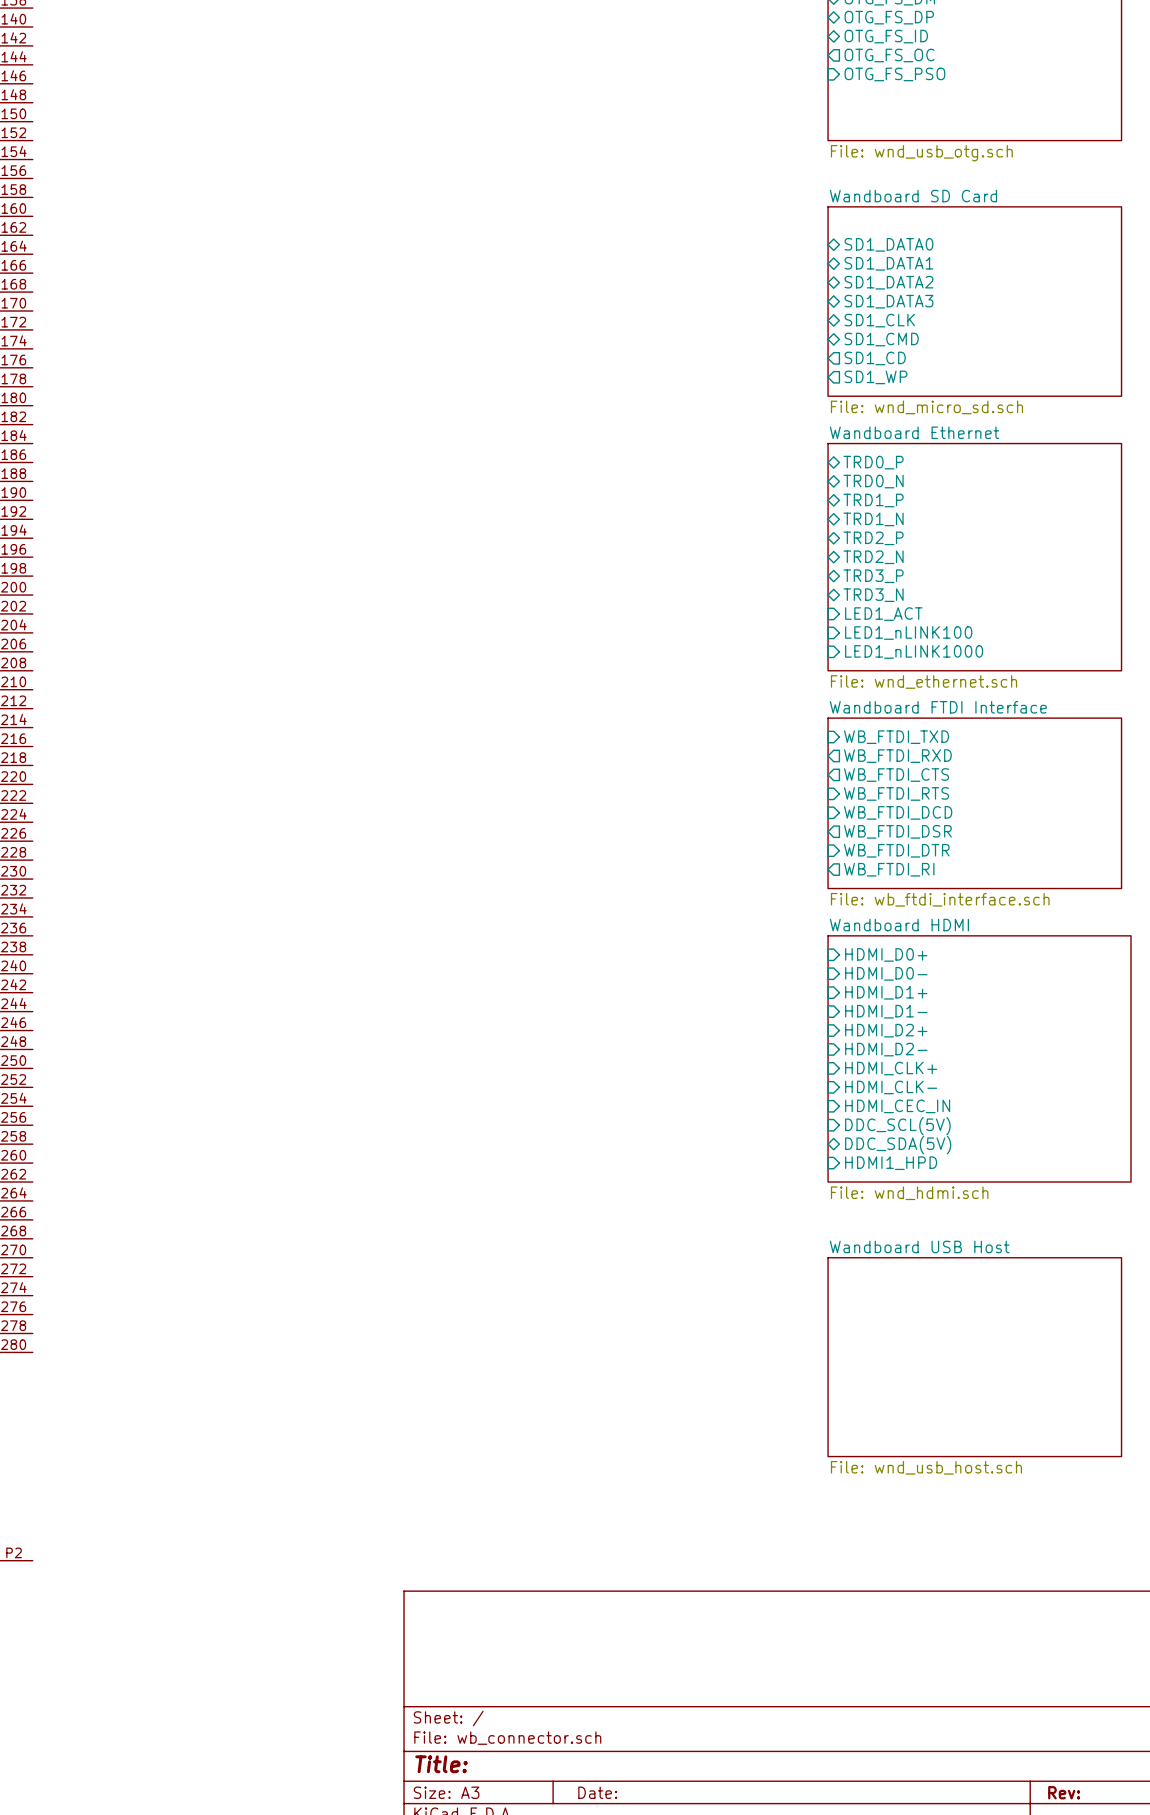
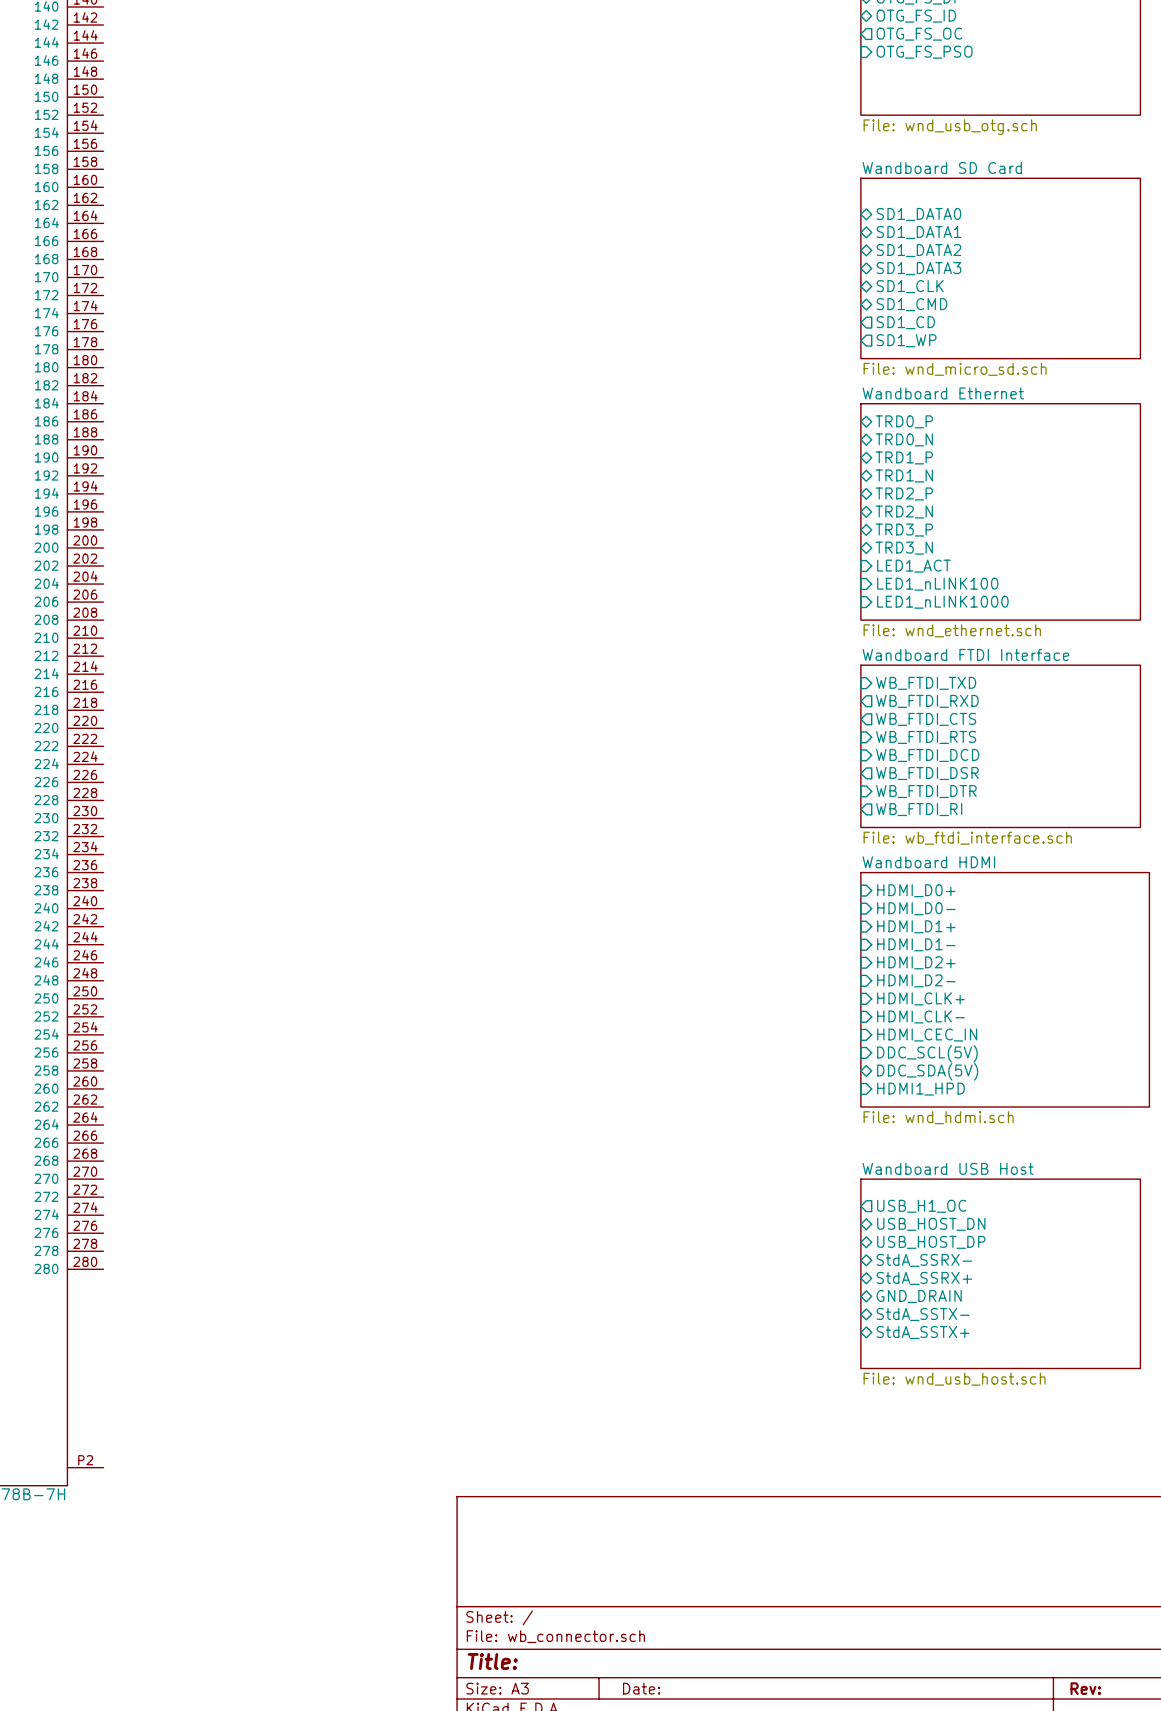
sheet pin: none -> USB_H1_OC (921, 1206)
sheet pin: none -> USB_HOST_DN (931, 1224)
sheet pin: none -> USB_HOST_DP (931, 1242)
sheet pin: none -> StdA_SSRX- (924, 1260)
sheet pin: none -> StdA_SSRX+ (924, 1278)
sheet pin: none -> GND_DRAIN (919, 1296)
sheet pin: none -> StdA_SSTX- (923, 1314)
sheet pin: none -> StdA_SSTX+ (923, 1332)

